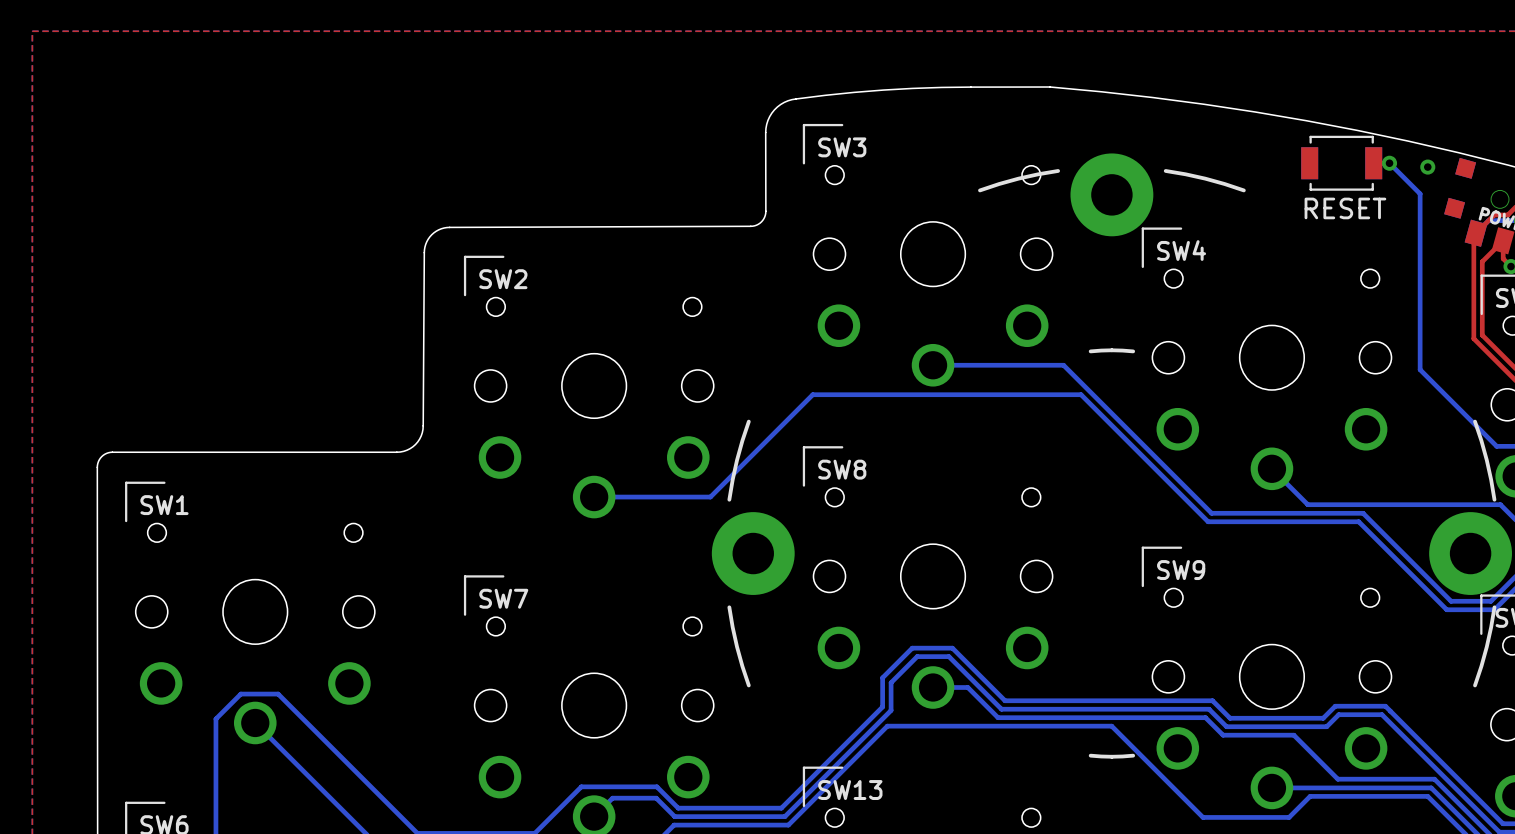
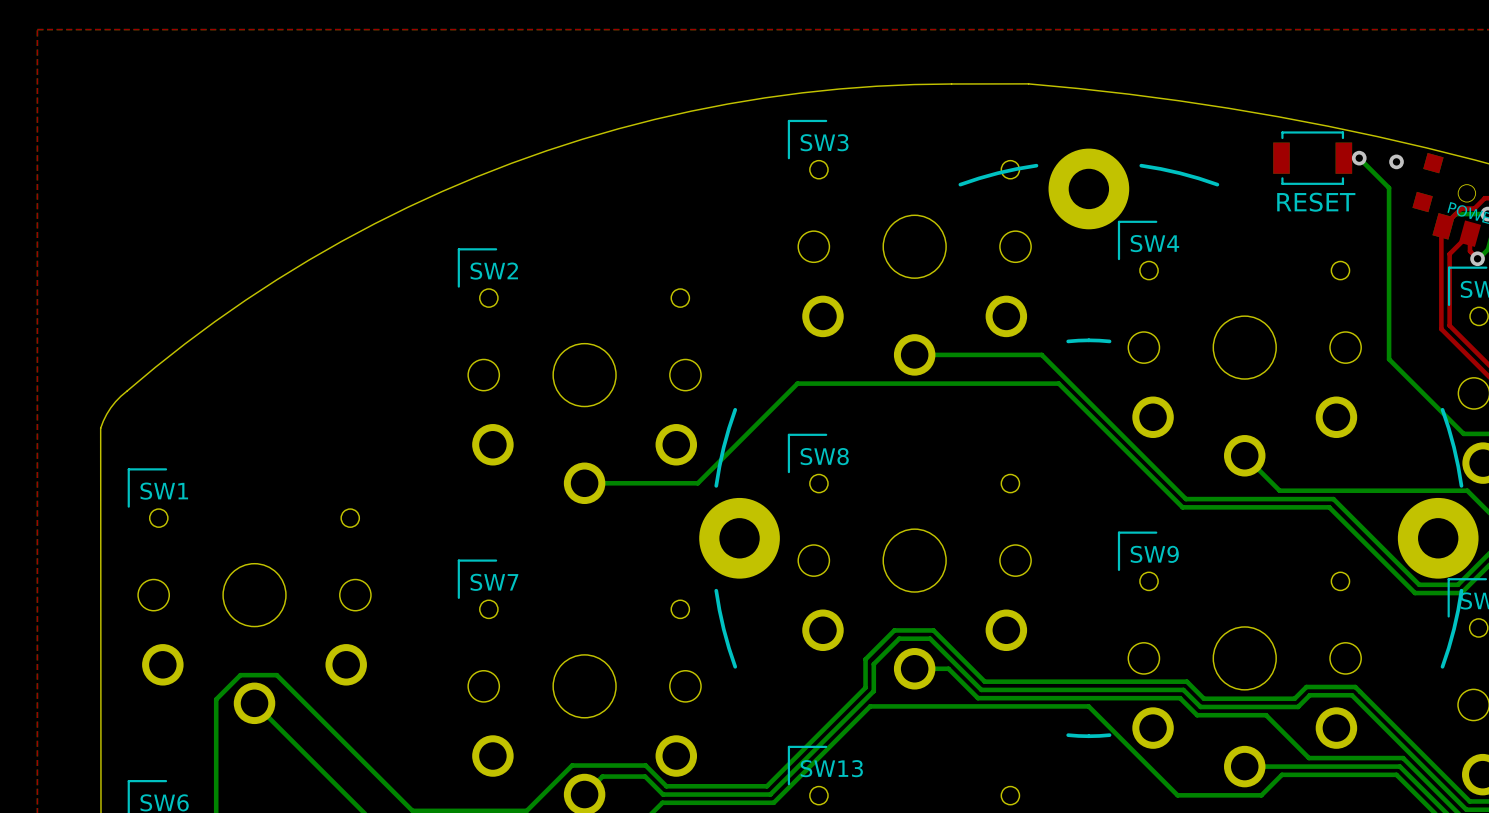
board edge: (970, 87) (854, 92) (792, 99) (780, 104) (771, 113) (766, 124) (765, 213) (762, 220) (754, 225) (449, 227) -> (951, 84) (839, 89) (764, 97) (691, 111) (618, 128) (546, 150) (442, 191) (374, 223) (308, 260) (245, 300) (184, 343) (120, 396) (110, 407) (100, 428) (100, 454)
board edge: (449, 227) (438, 229) (431, 234) (424, 249) (423, 425) (419, 439) (412, 446) (396, 452) (112, 452) (101, 456) (97, 467) -> none

